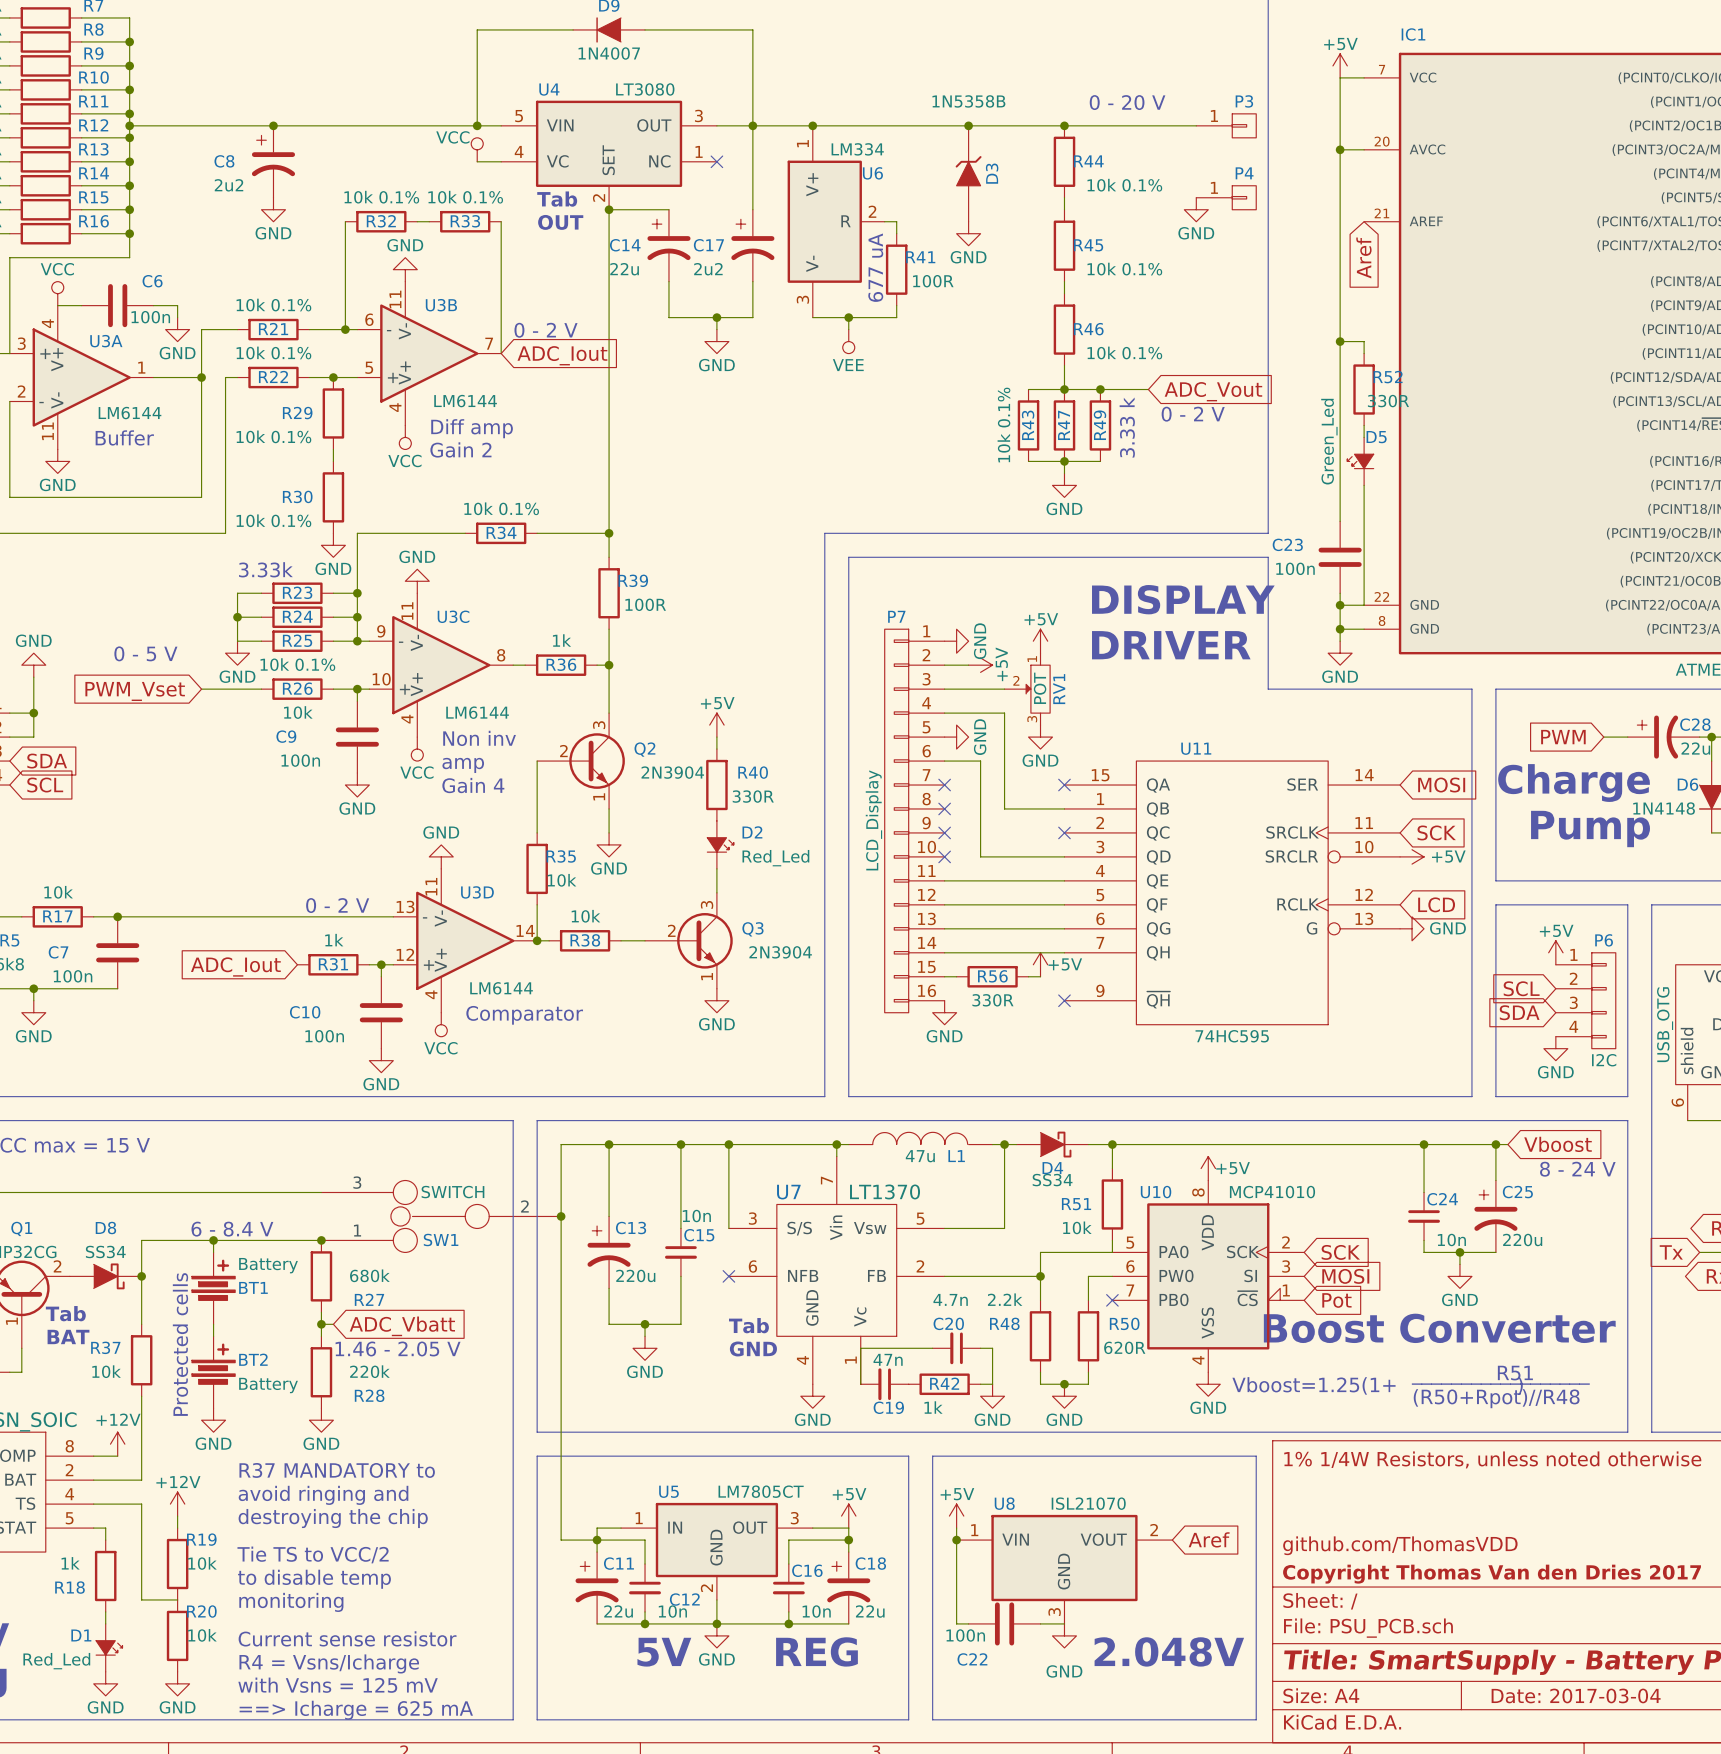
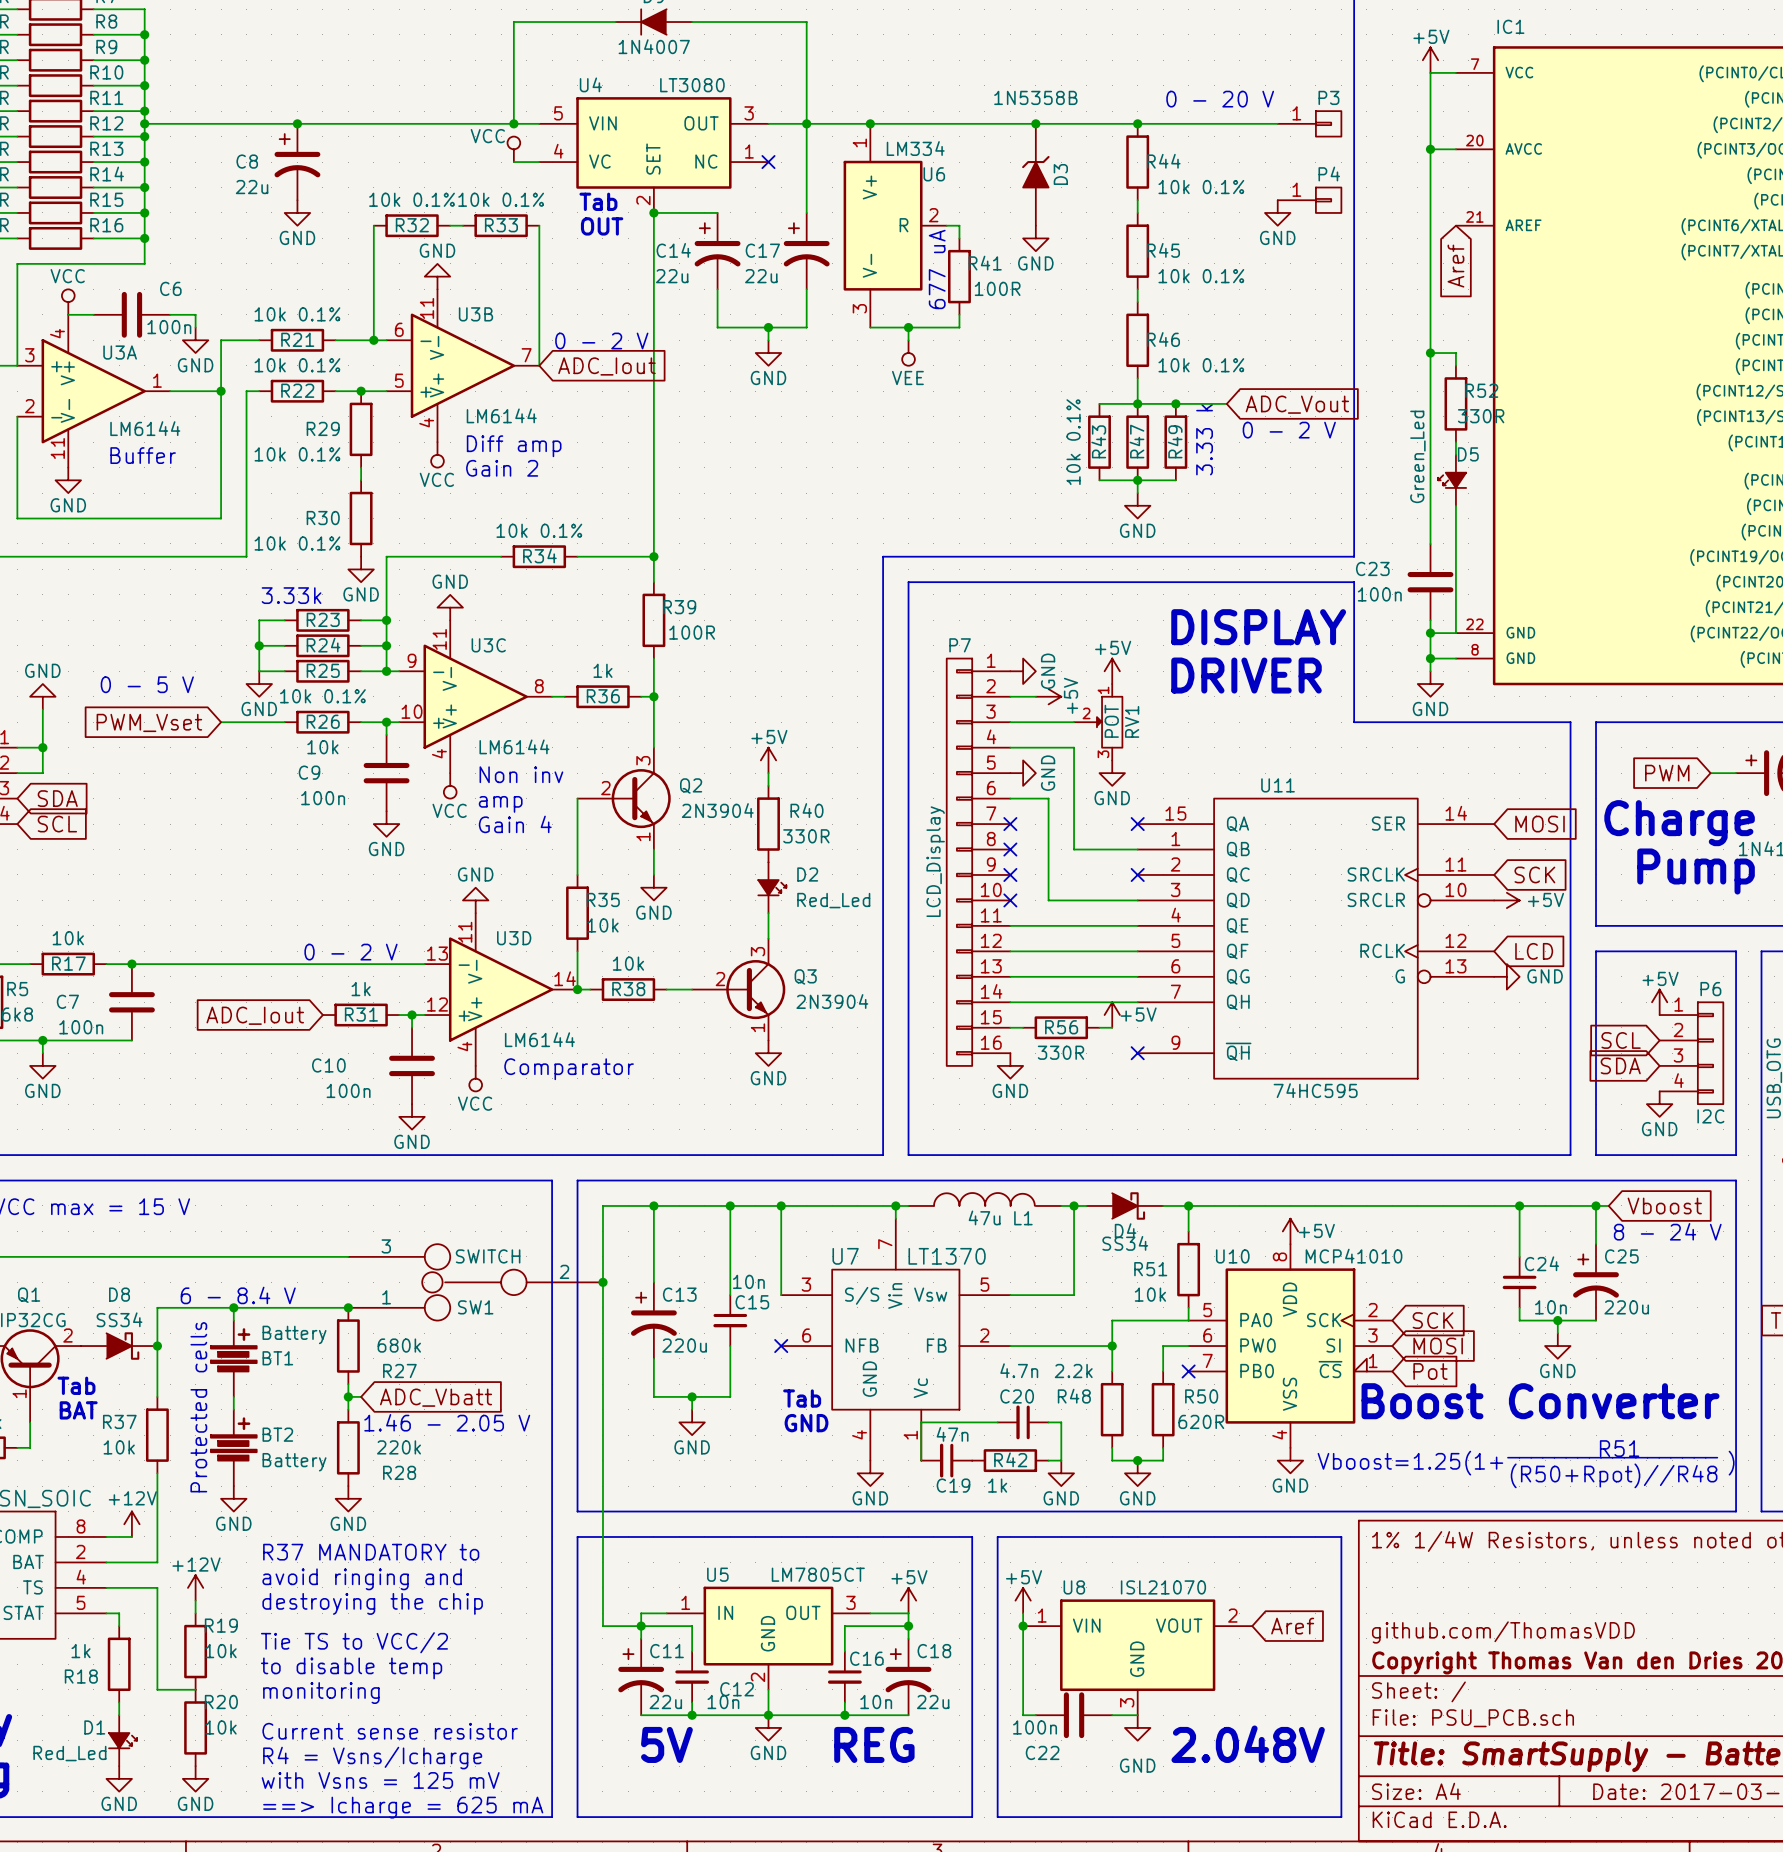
C8 value: 2u2 (229, 185) -> 22u (252, 187)
C17 value: 2u2 (708, 269) -> 22u (761, 276)

